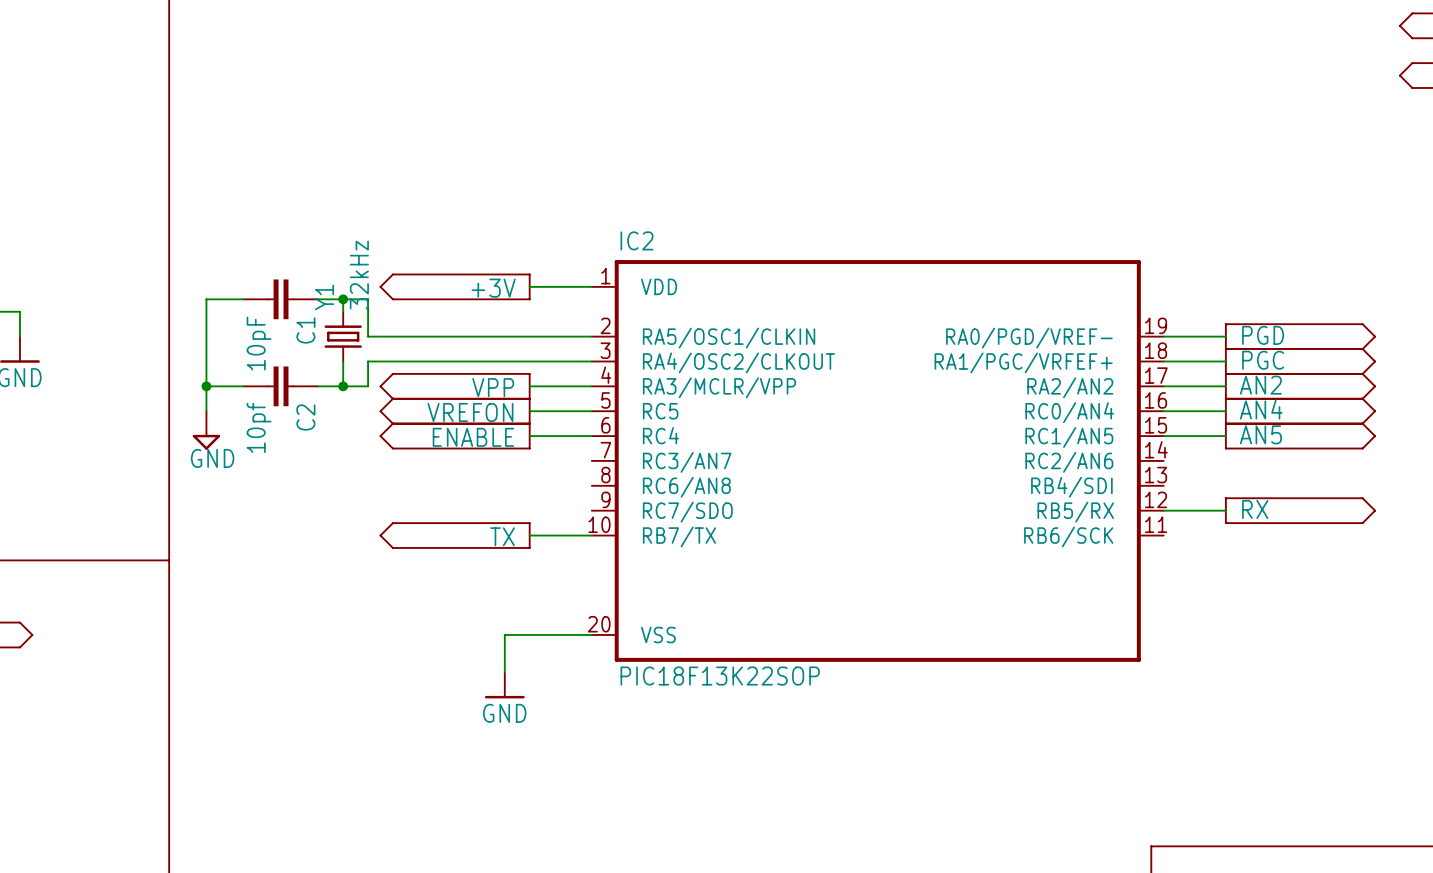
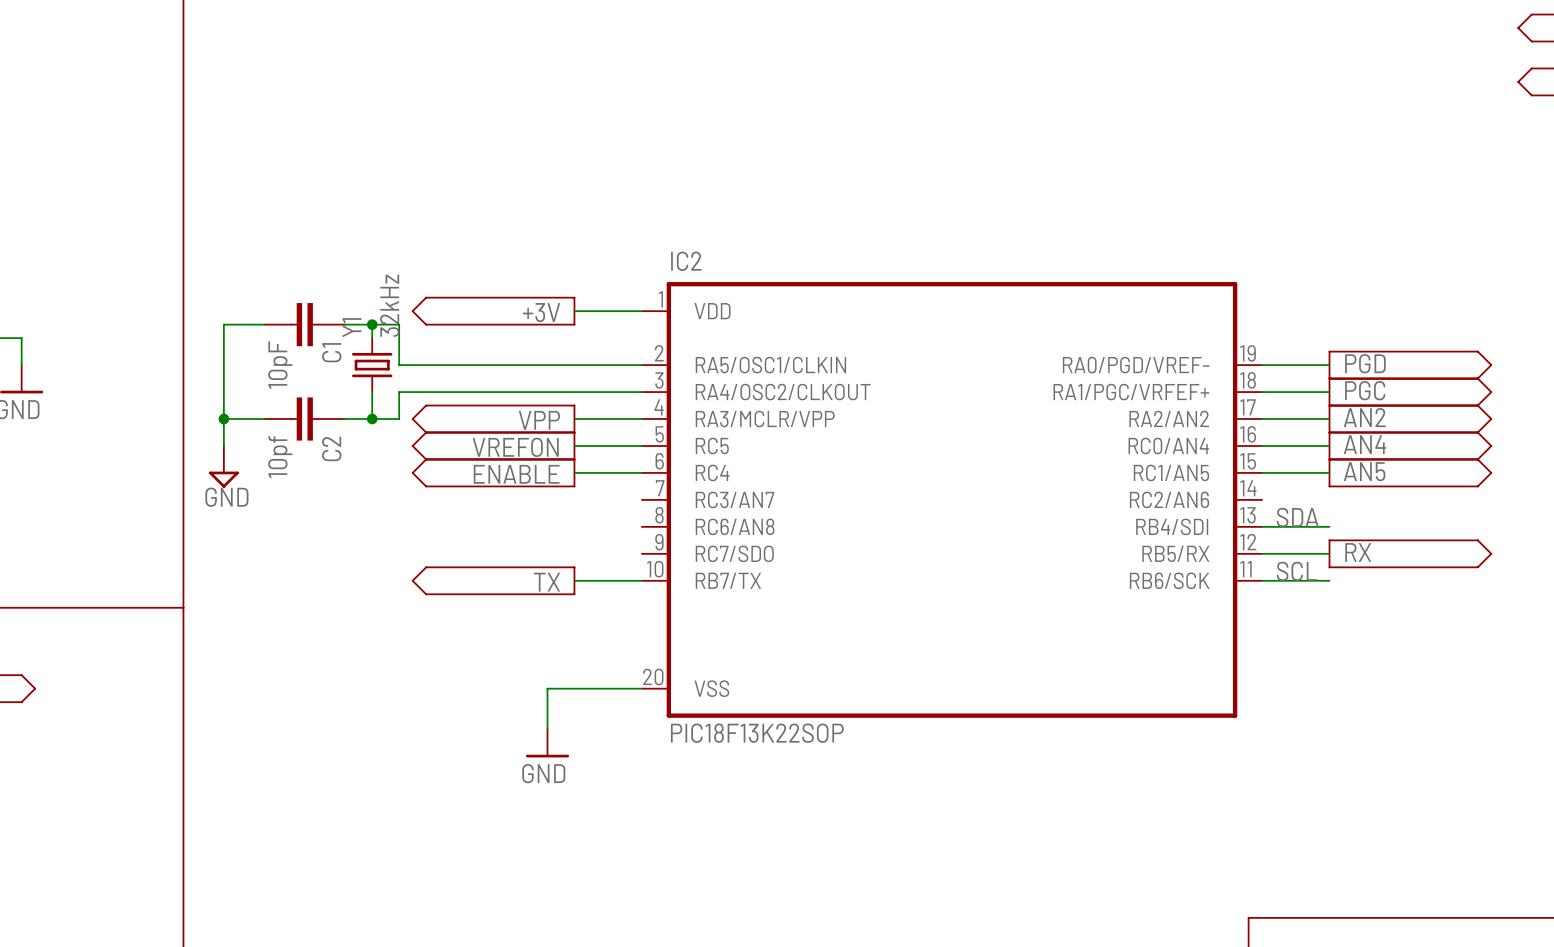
label: none -> SDA (1297, 517)
wire: none -> (1262, 526) (1329, 526)
label: none -> SCL (1297, 571)
wire: none -> (1262, 580) (1329, 580)

